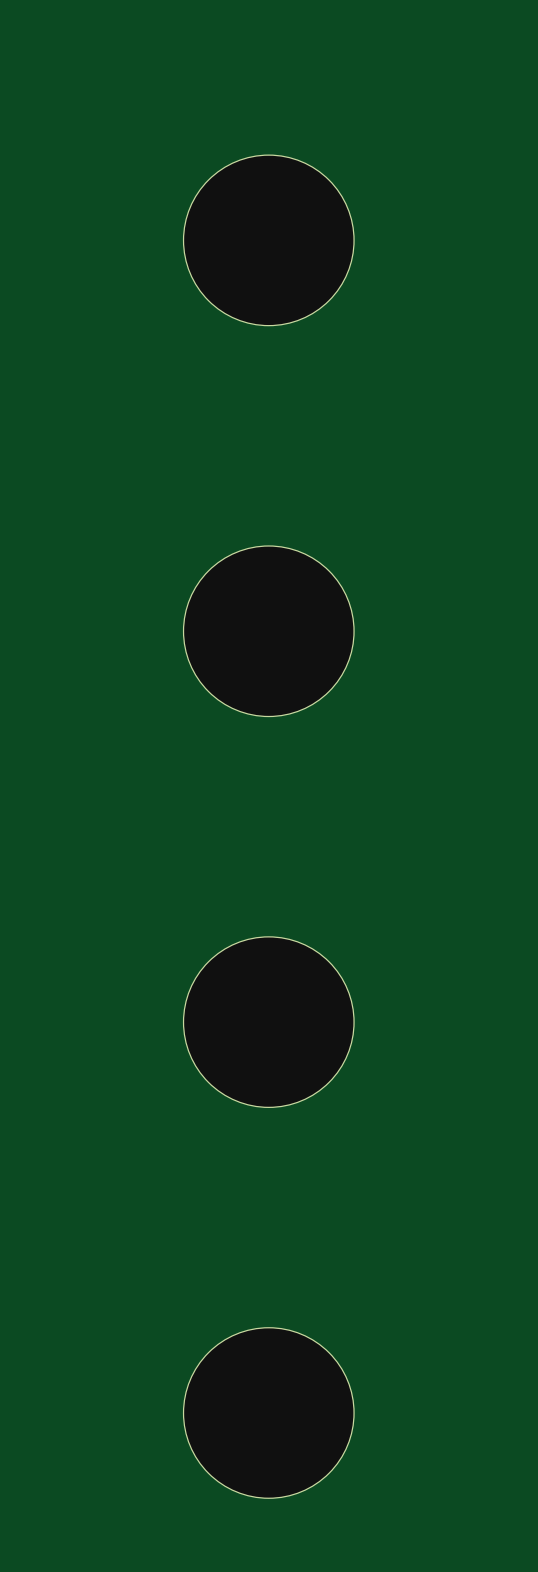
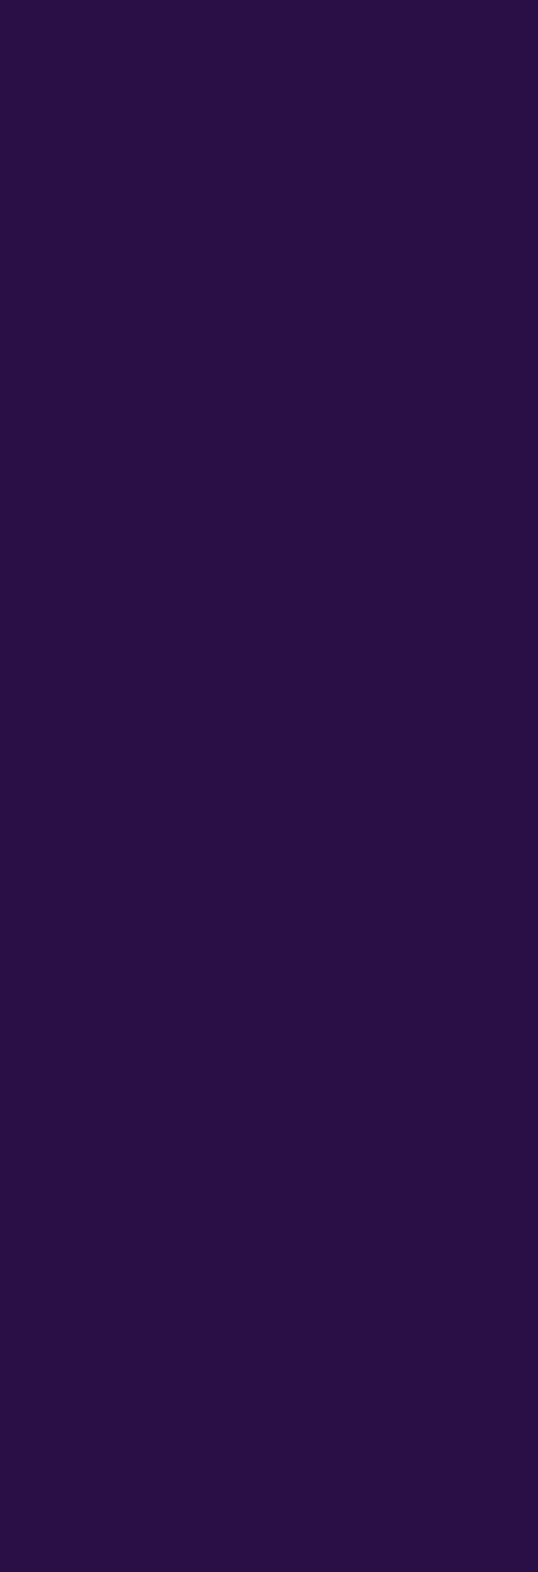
part: (268, 240) -> none
part: (268, 631) -> none
part: (268, 1022) -> none
part: (268, 1413) -> none

